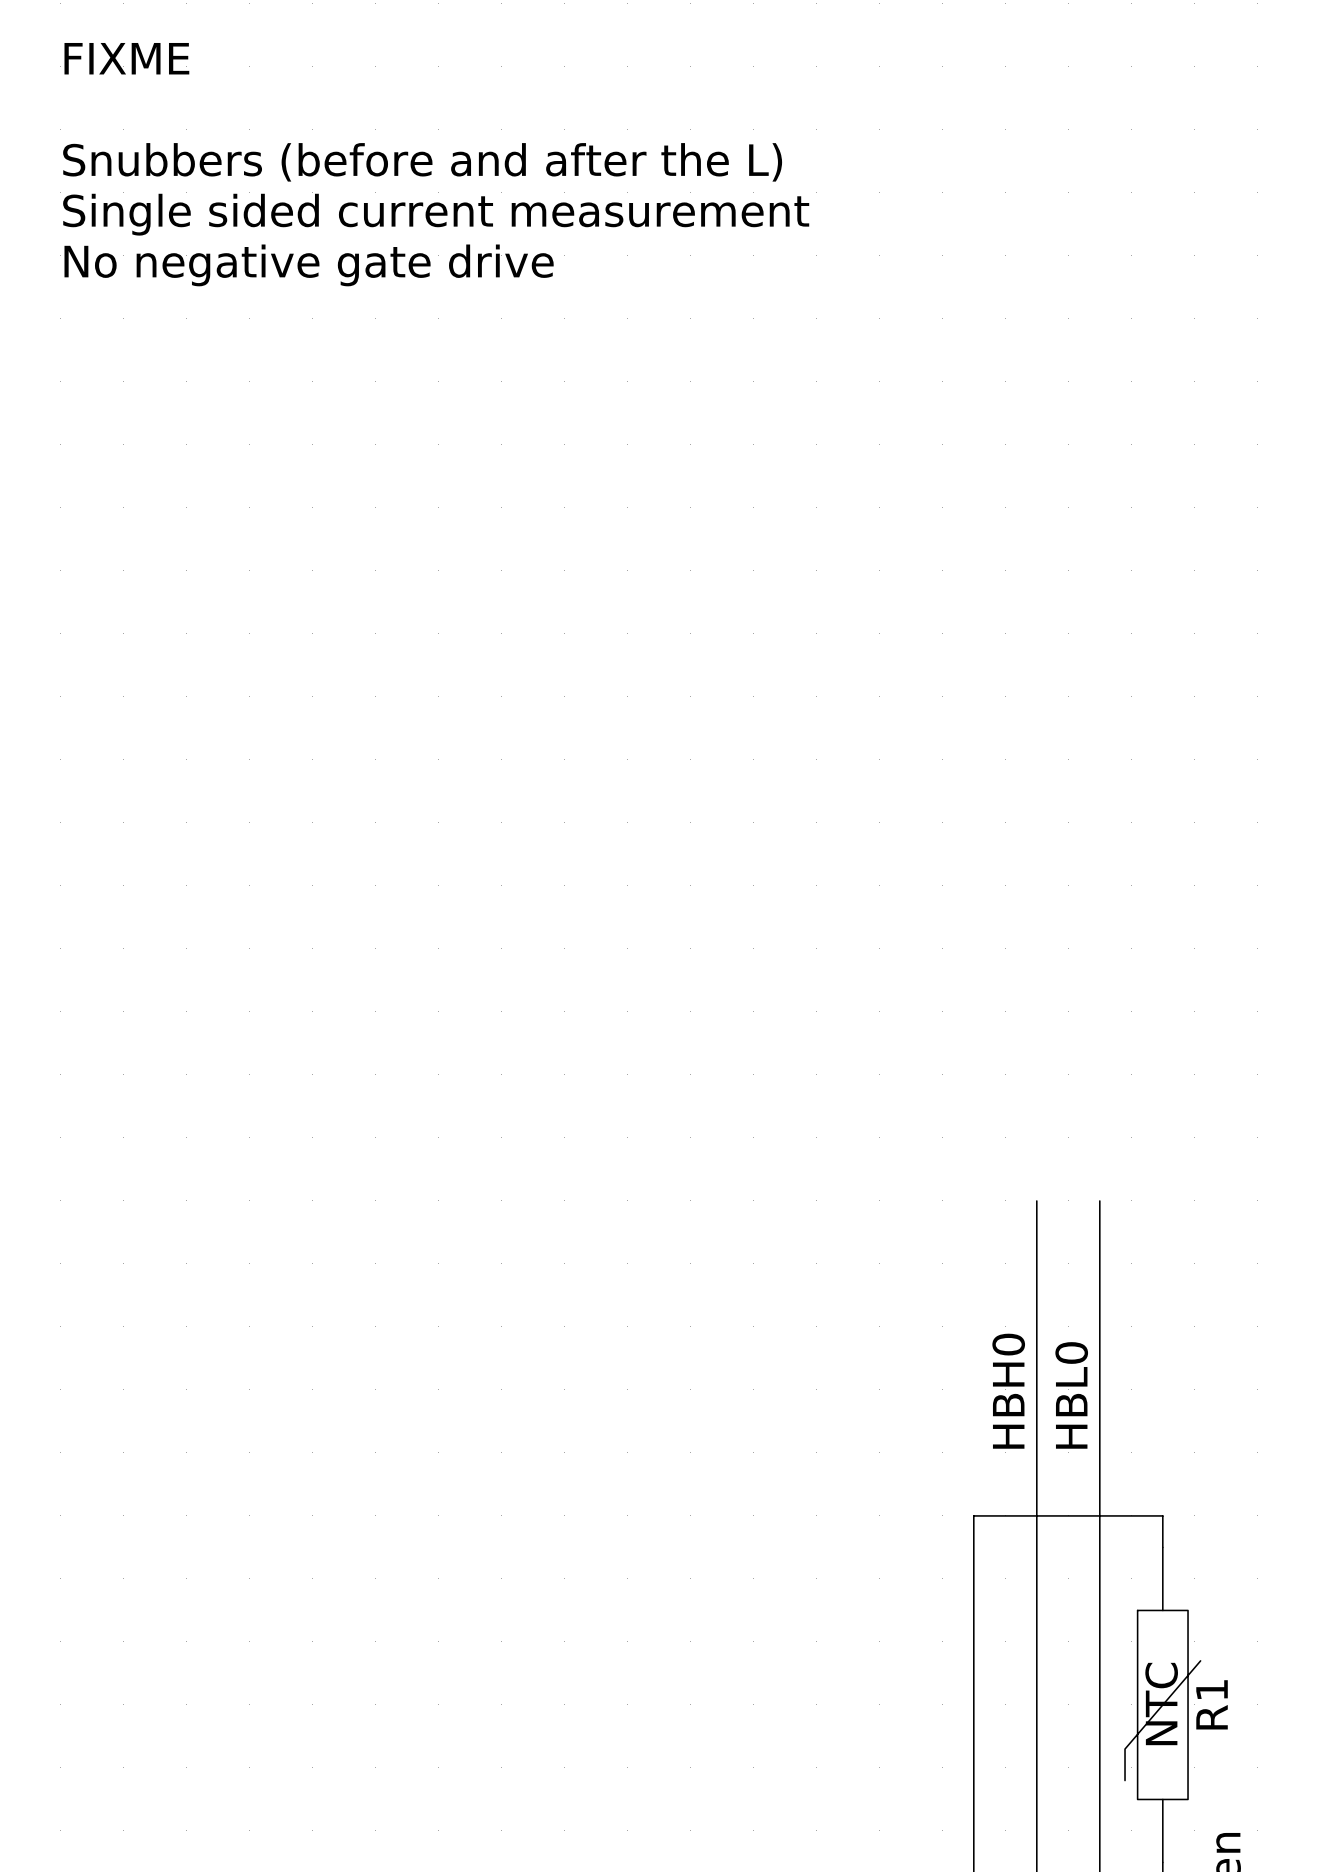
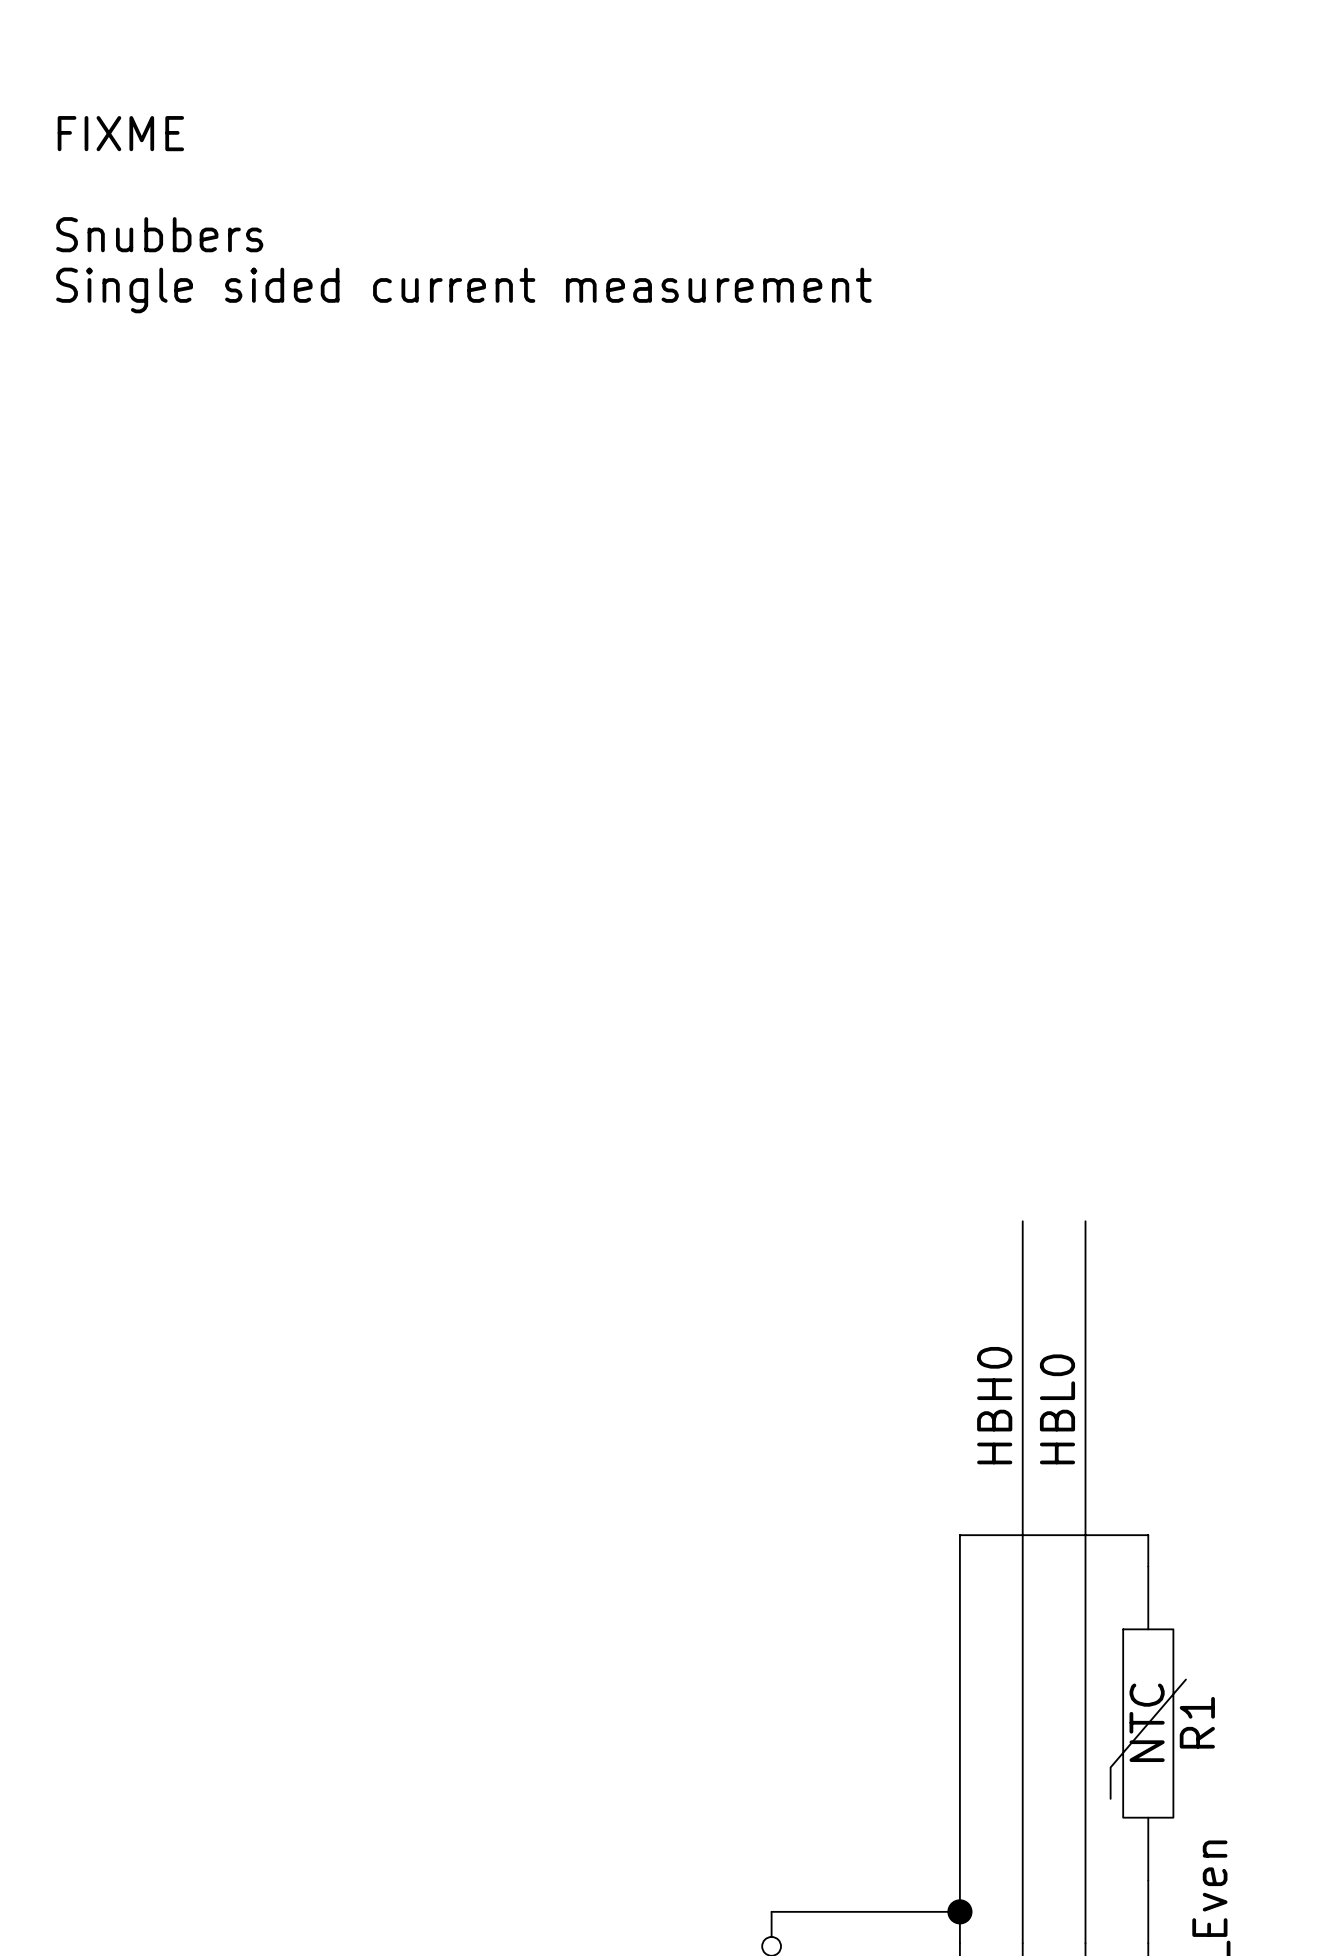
text position: FIXME (126, 58) -> FIXME (120, 133)
text: Snubbers (before and after the L) (422, 162) -> none
text: Single sided current measurement (436, 214) -> Snubbers (159, 234)
text: No negative gate drive (309, 265) -> Single sided current measurement (463, 290)

